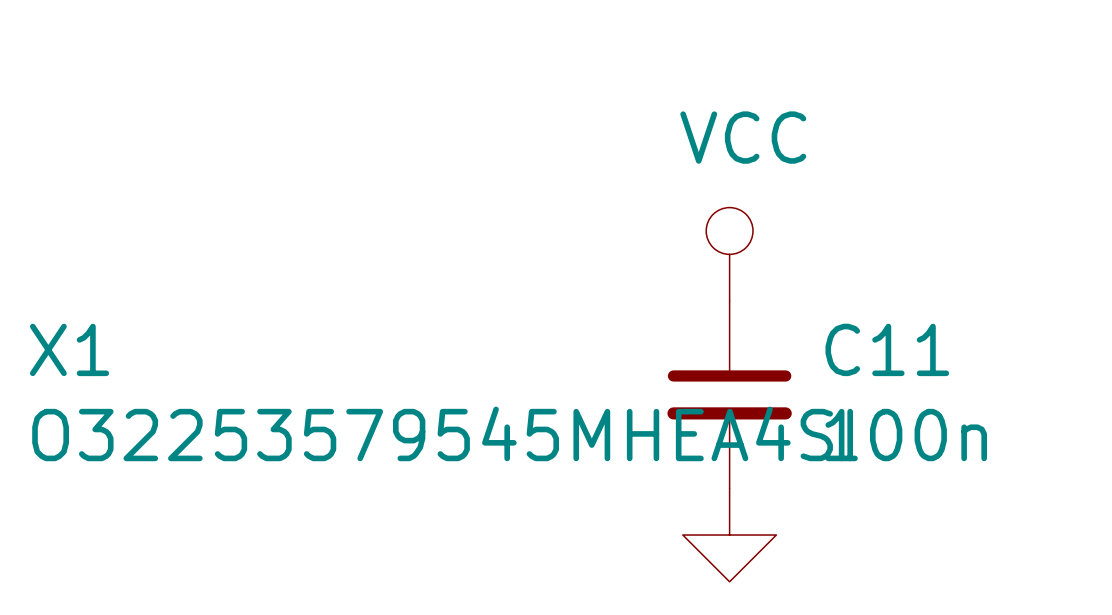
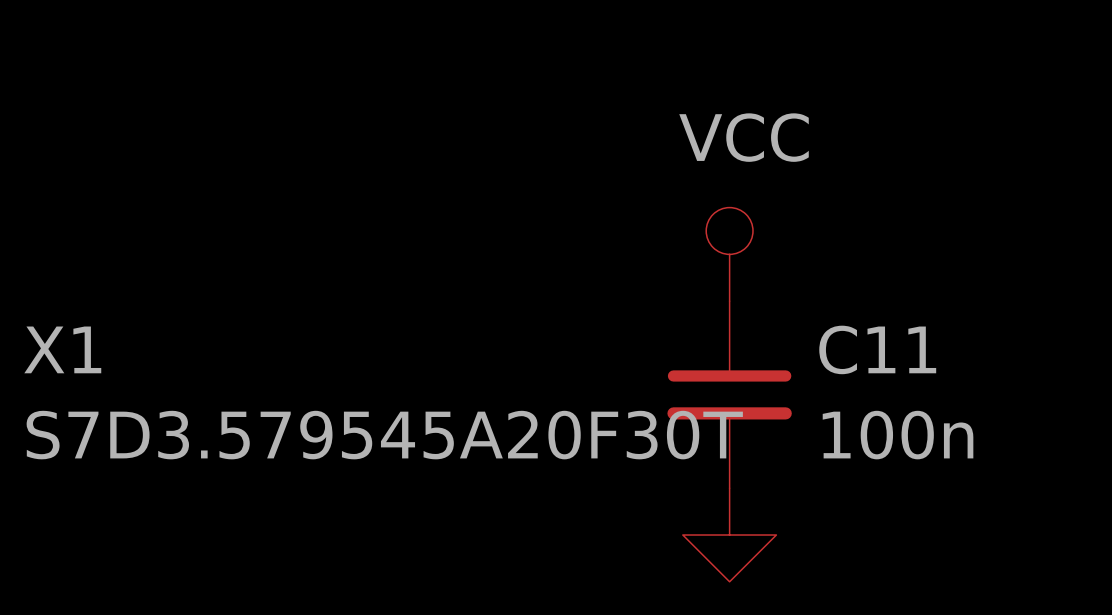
X1 value: O32253579545MHEA4SI (442, 433) -> S7D3.579545A20F30T (384, 435)

